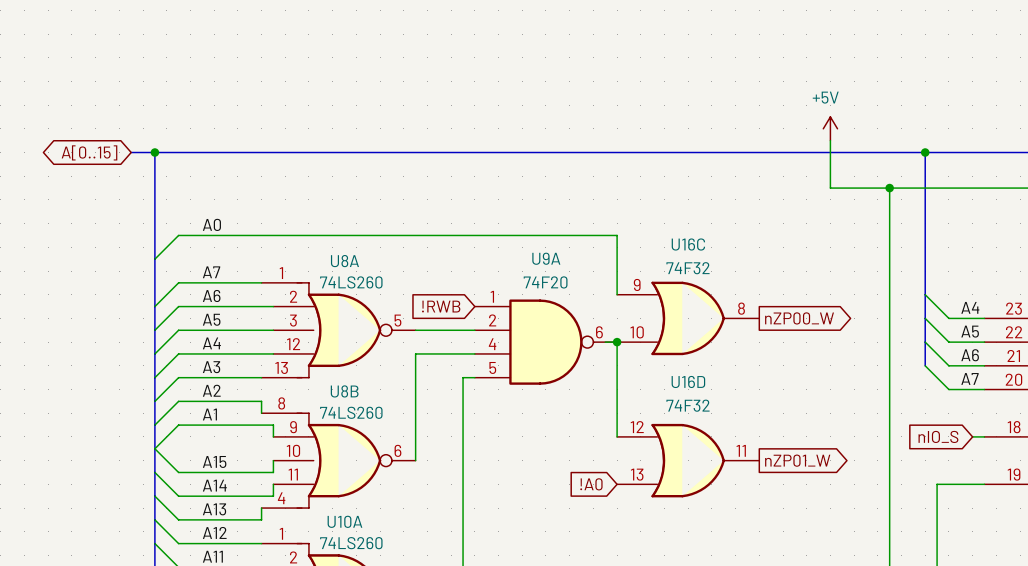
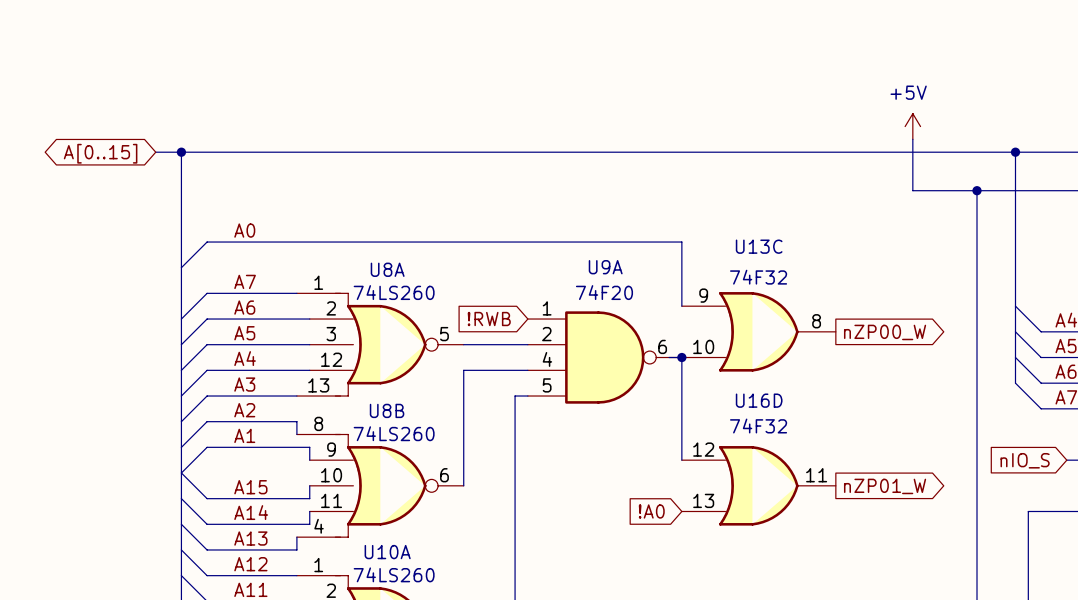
U16C name: U16C (688, 244) -> U13C (759, 246)

